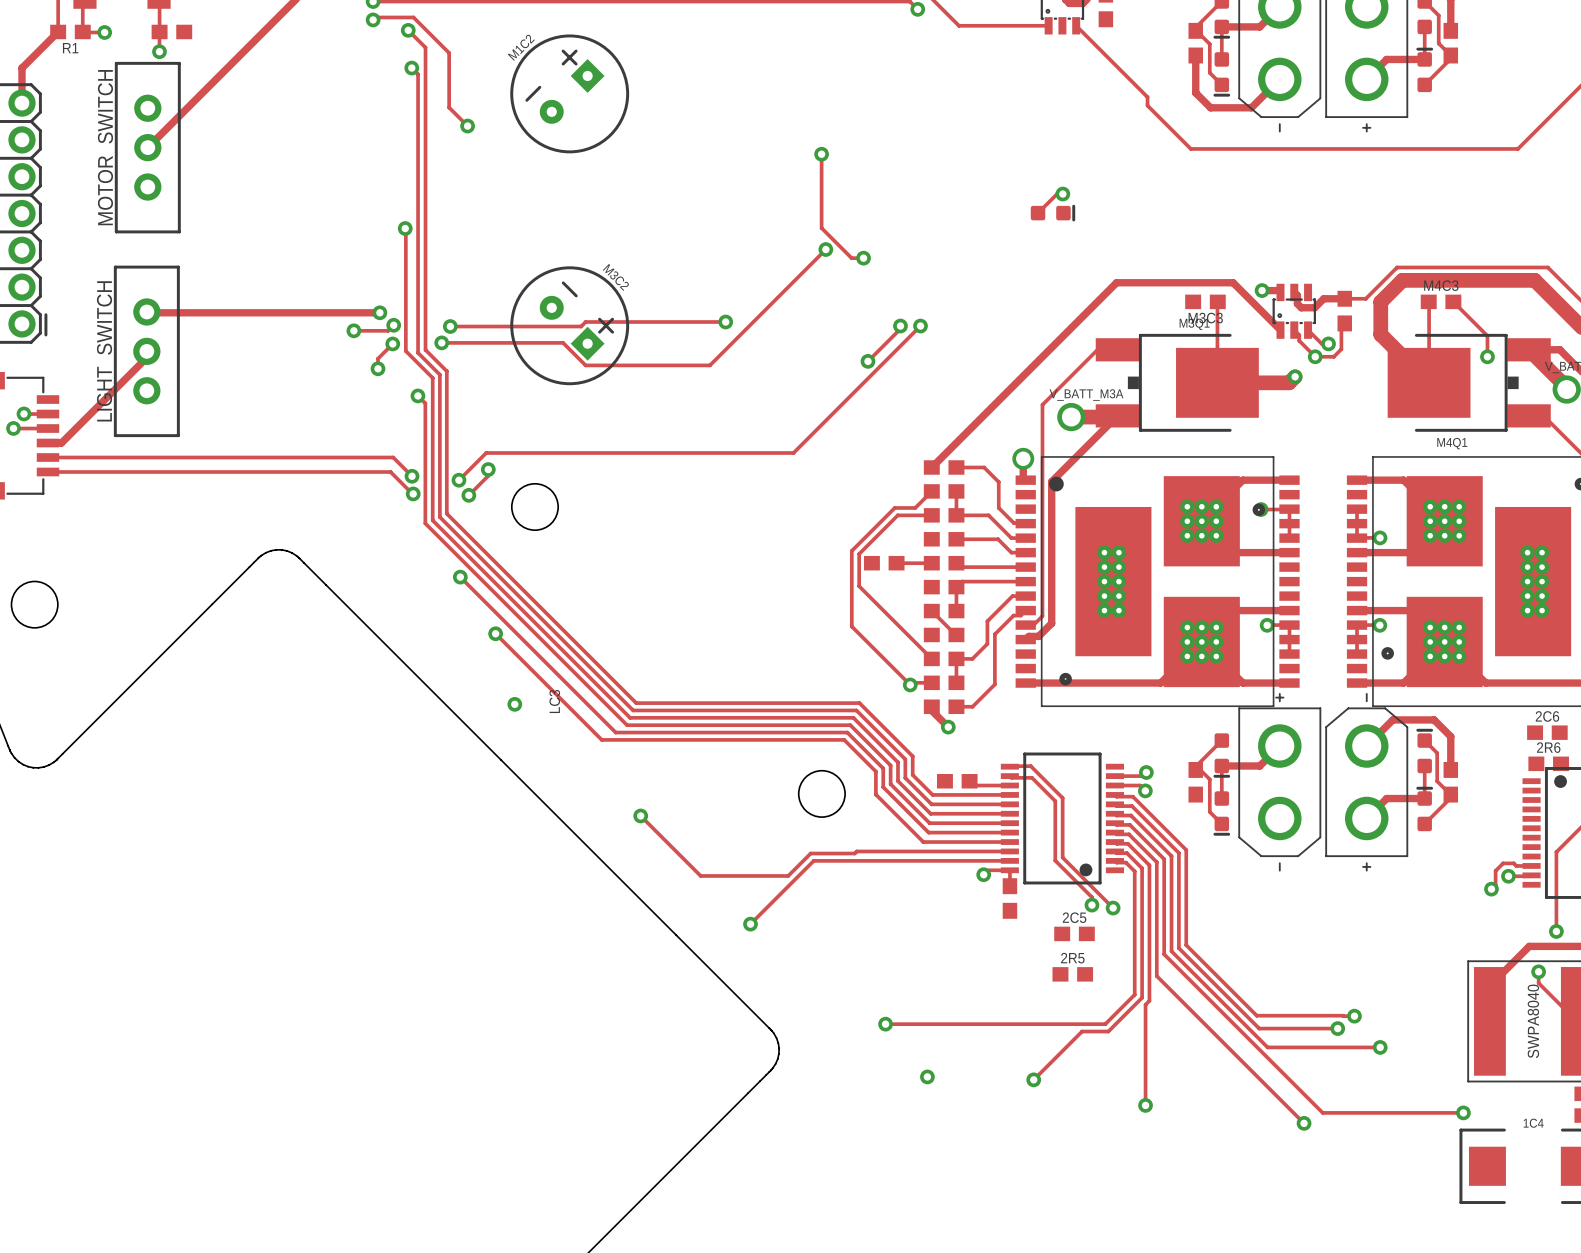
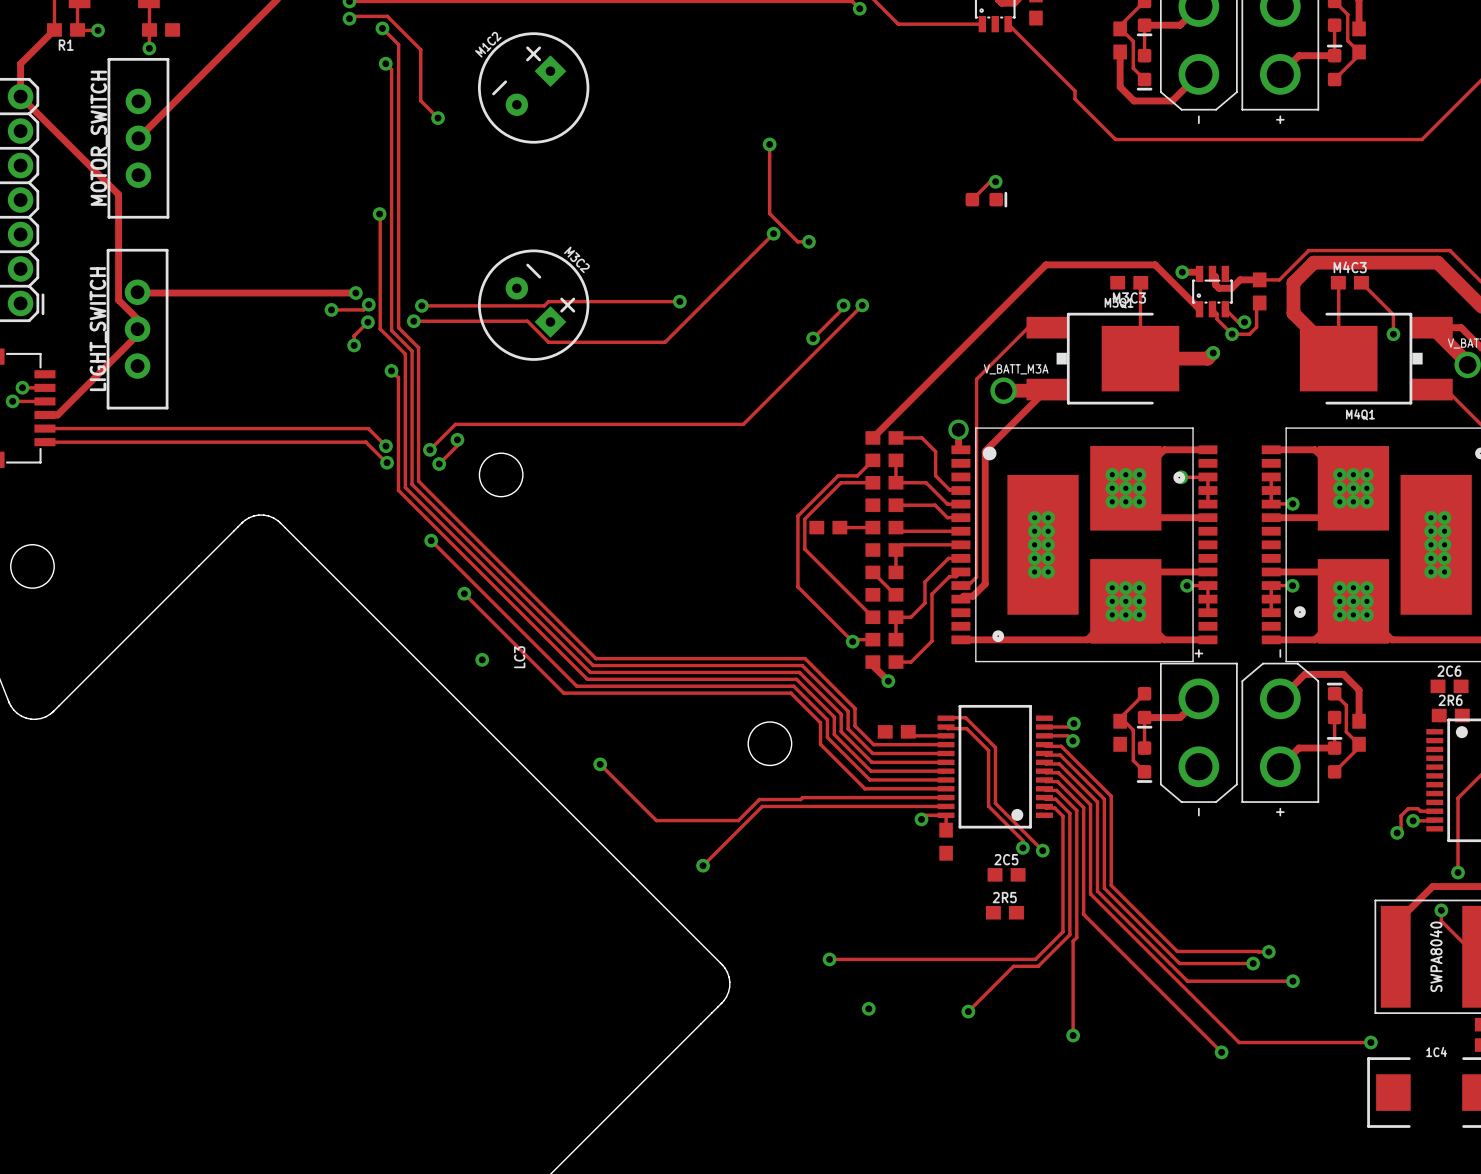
track: none -> (20, 96) (118, 194) (118, 300) (137, 319) (137, 329)

